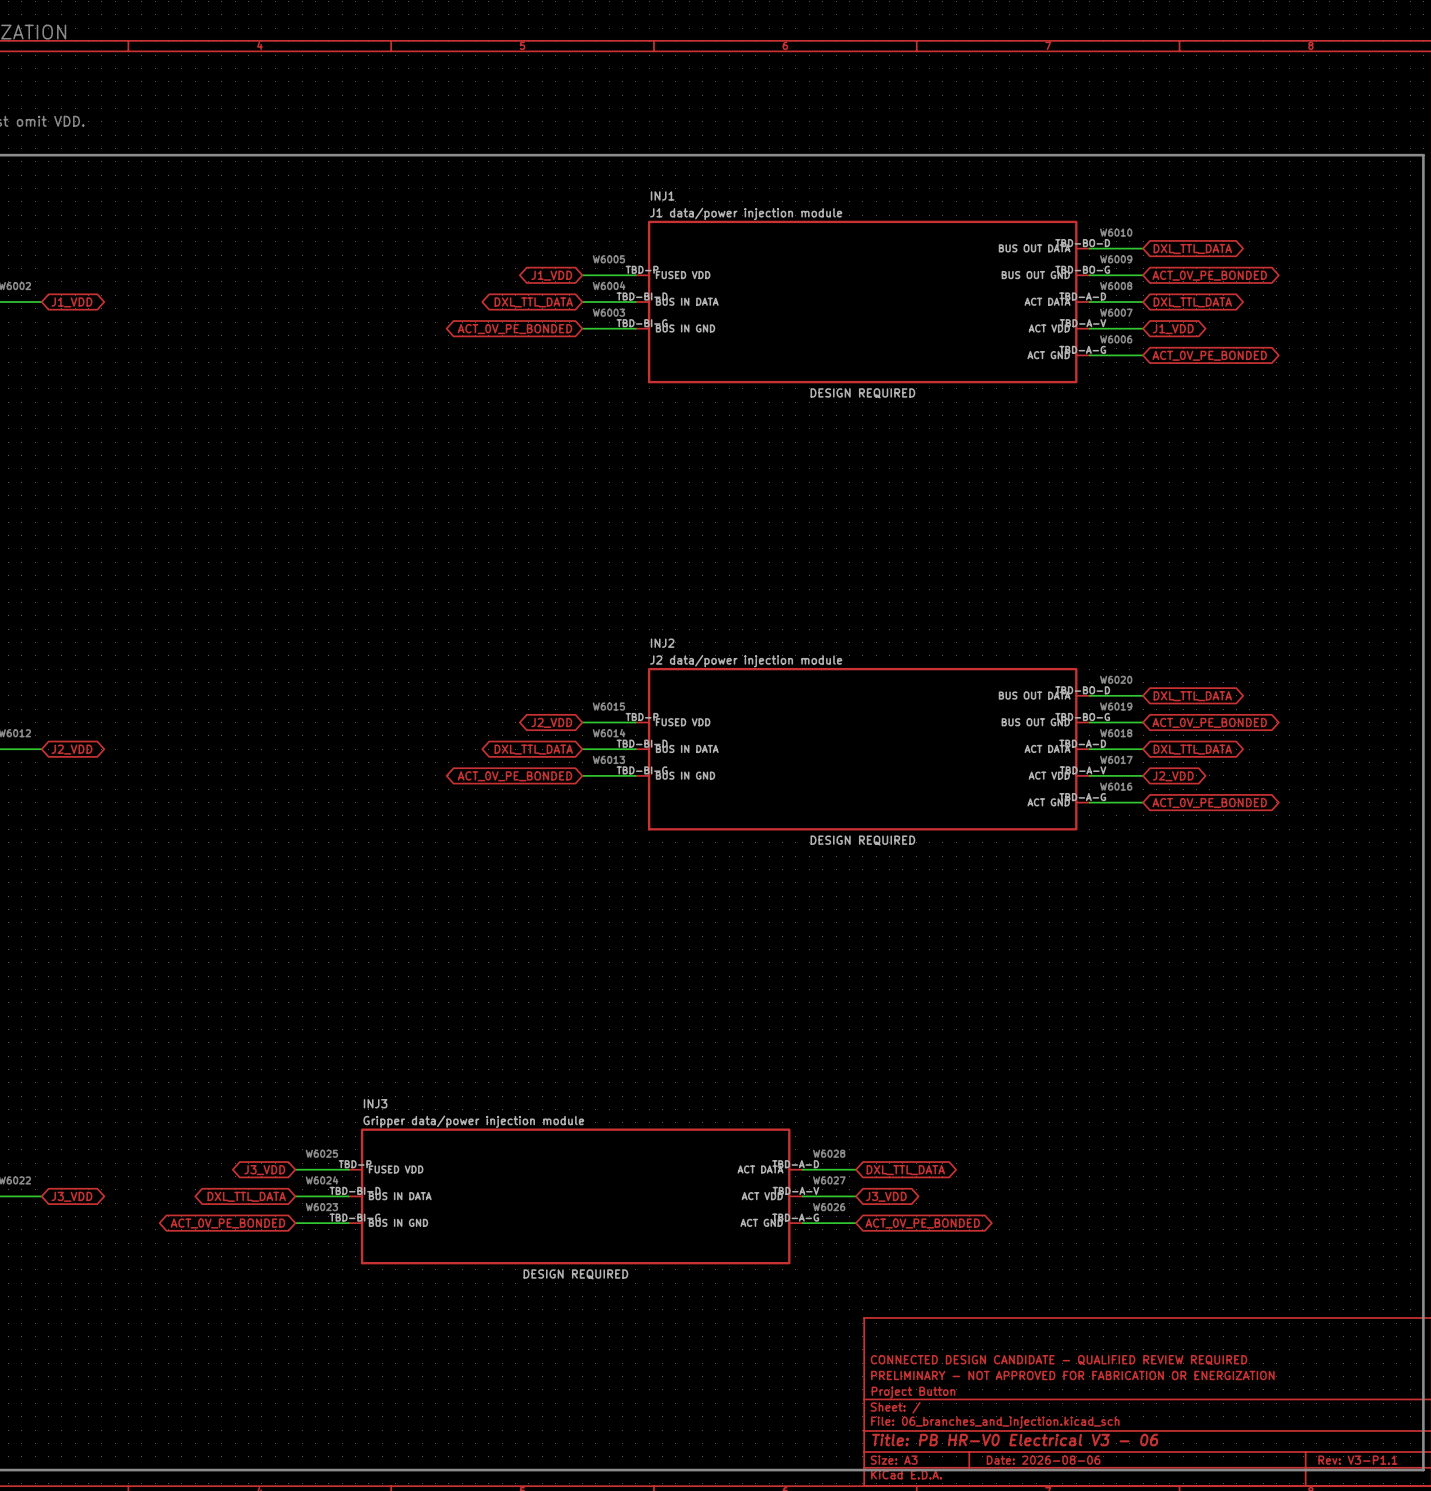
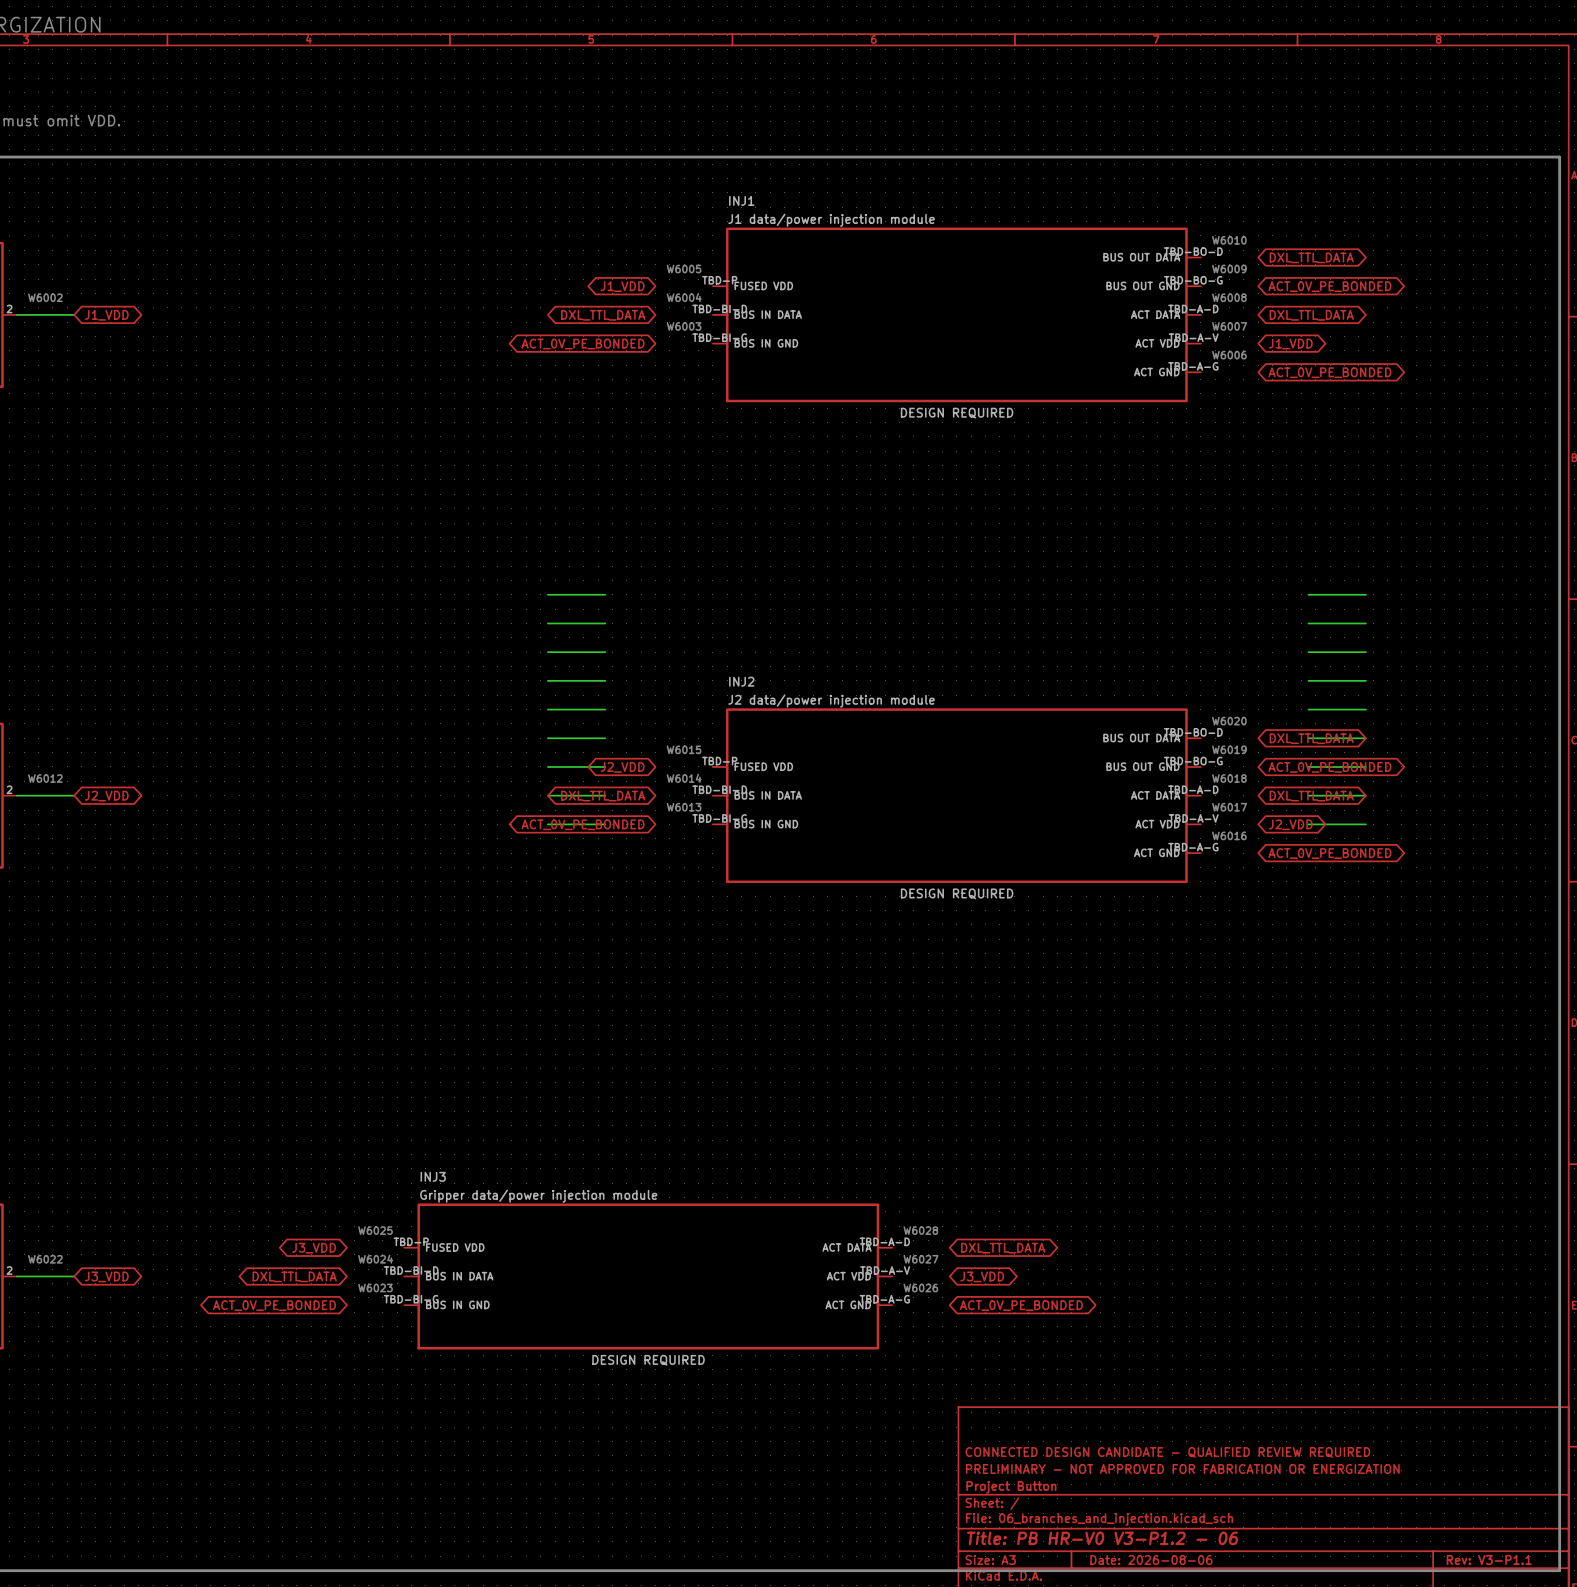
wire: (1089, 248) (1143, 248) -> none
wire: (582, 275) (635, 275) -> none
wire: (1089, 275) (1143, 275) -> none
wire: (582, 302) (635, 302) -> none
wire: (1089, 302) (1143, 302) -> none
wire: (582, 328) (635, 328) -> none
wire: (1089, 328) (1143, 328) -> none
wire: (1089, 355) (1143, 355) -> none
wire: none -> (547, 594) (605, 594)
wire: none -> (1308, 594) (1365, 594)
wire: none -> (547, 623) (605, 623)
wire: none -> (1308, 623) (1365, 623)
wire: none -> (547, 652) (605, 652)
wire: none -> (1308, 652) (1365, 652)
wire: none -> (547, 680) (605, 680)
wire: none -> (1308, 680) (1365, 680)
wire: none -> (547, 709) (605, 709)
wire: none -> (547, 738) (605, 738)
wire: (1089, 695) (1143, 695) -> (1308, 709) (1365, 709)
wire: (582, 722) (635, 722) -> (547, 766) (605, 766)
wire: (1089, 722) (1143, 722) -> (1308, 738) (1365, 738)
wire: (582, 749) (635, 749) -> (547, 795) (605, 795)
wire: (1089, 749) (1143, 749) -> (1308, 766) (1365, 766)
wire: (582, 775) (635, 775) -> (547, 824) (605, 824)
wire: (1089, 775) (1143, 775) -> (1308, 795) (1365, 795)
wire: (1089, 802) (1143, 802) -> (1308, 824) (1365, 824)
wire: (295, 1169) (348, 1169) -> none
wire: (802, 1169) (856, 1169) -> none
wire: (295, 1196) (348, 1196) -> none
wire: (802, 1196) (856, 1196) -> none
wire: (295, 1223) (348, 1223) -> none
wire: (802, 1223) (856, 1223) -> none
title block: Title: PB HR-V0 Electrical V3 - 06 (1015, 1440) -> Title: PB HR-V0 V3-P1.2 - 06 (1102, 1538)

